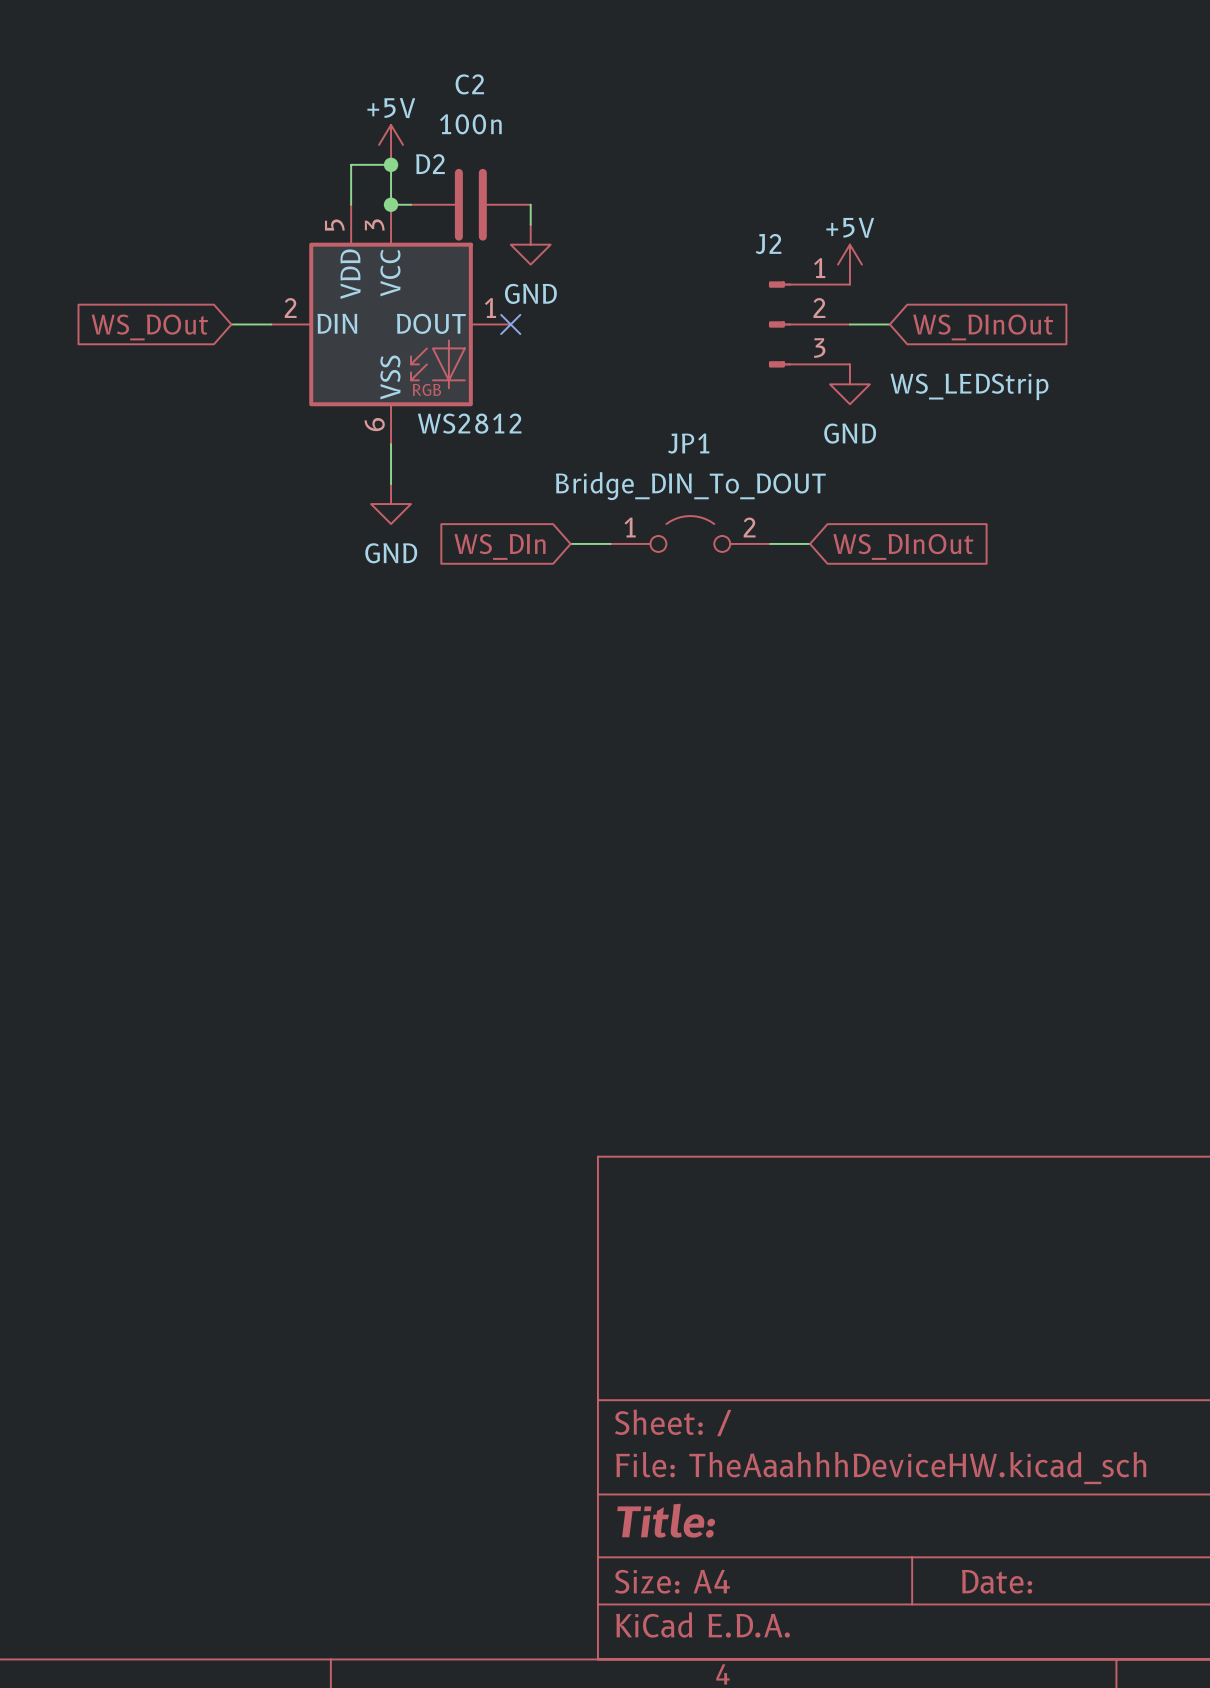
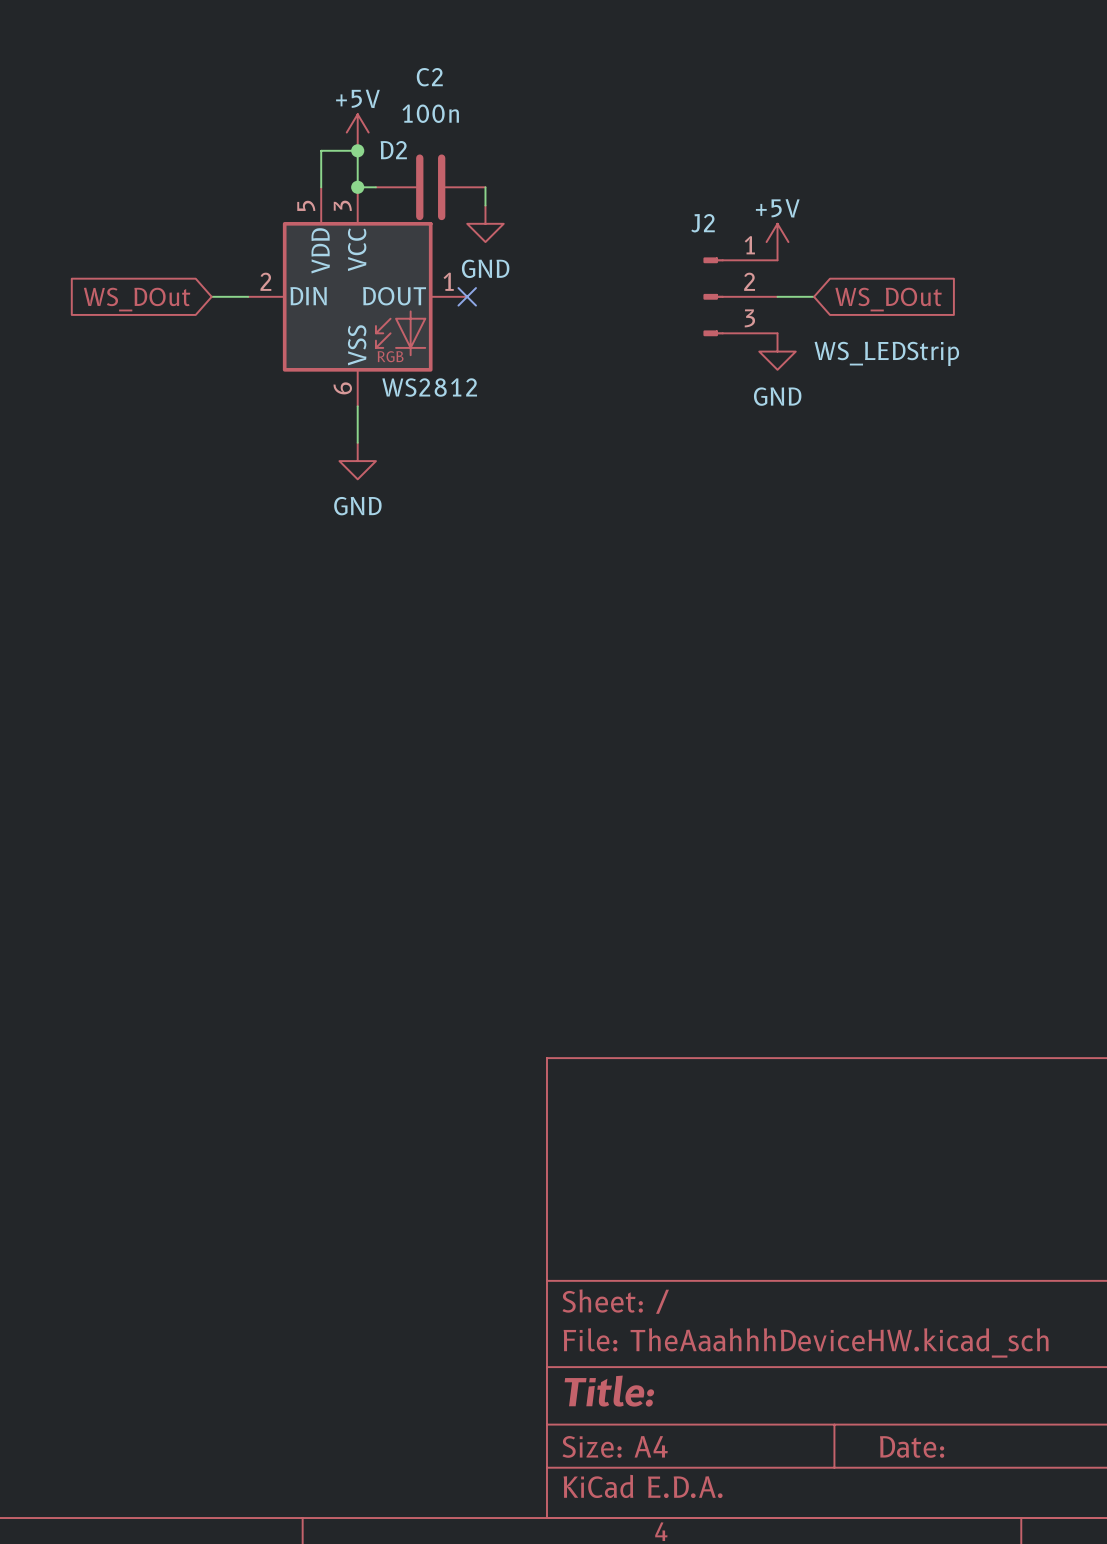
global label: WS_DInOut (983, 327) -> WS_DOut (888, 299)
JP1: Bridge_DIN_To_DOUT (690, 533) -> none
wire: (570, 543) (610, 543) -> none
wire: (770, 543) (810, 543) -> none
global label: WS_DIn (500, 546) -> none
global label: WS_DInOut (903, 546) -> none

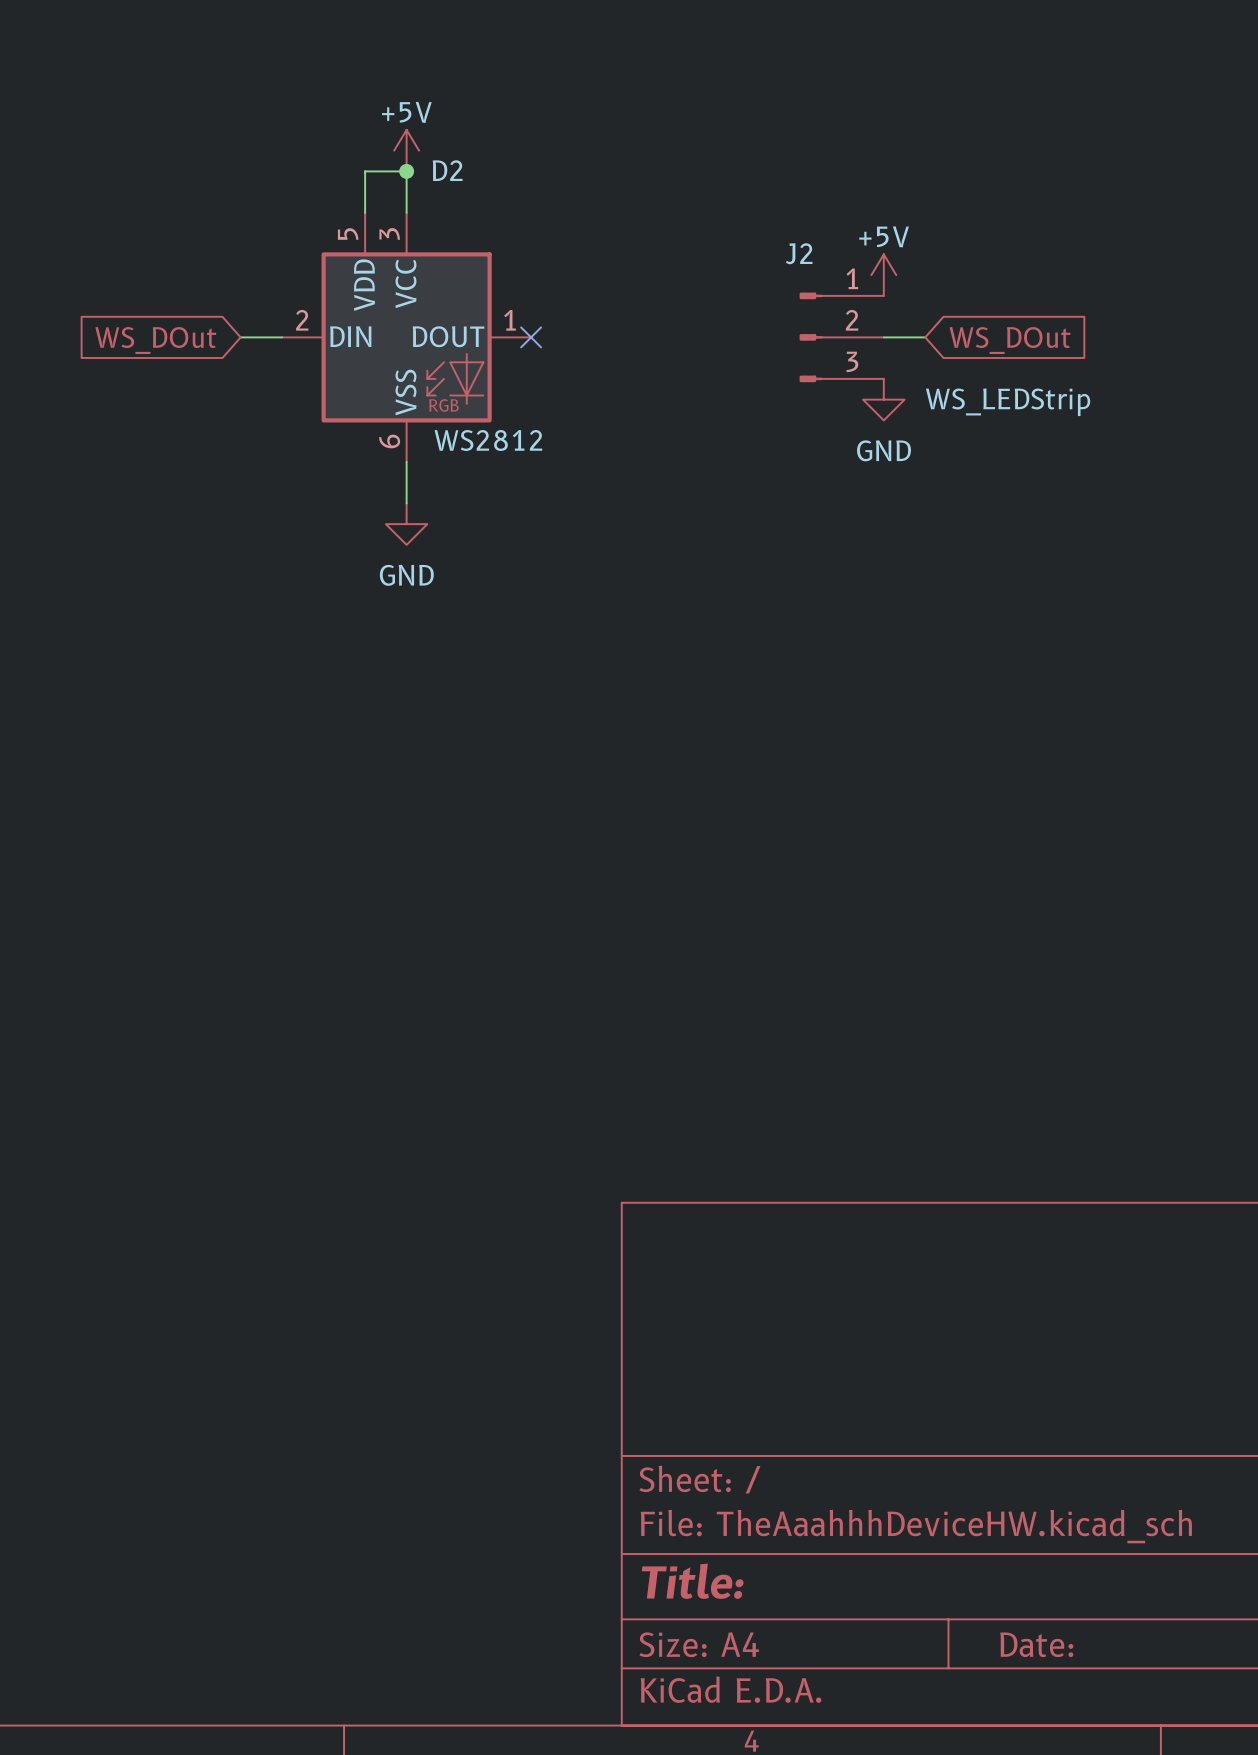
wire: (357, 187) (375, 187) -> none
junction: (357, 187) -> none
C2: 100n (430, 187) -> none
wire: (485, 187) (485, 205) -> none
power symbol: GND (485, 223) -> none

